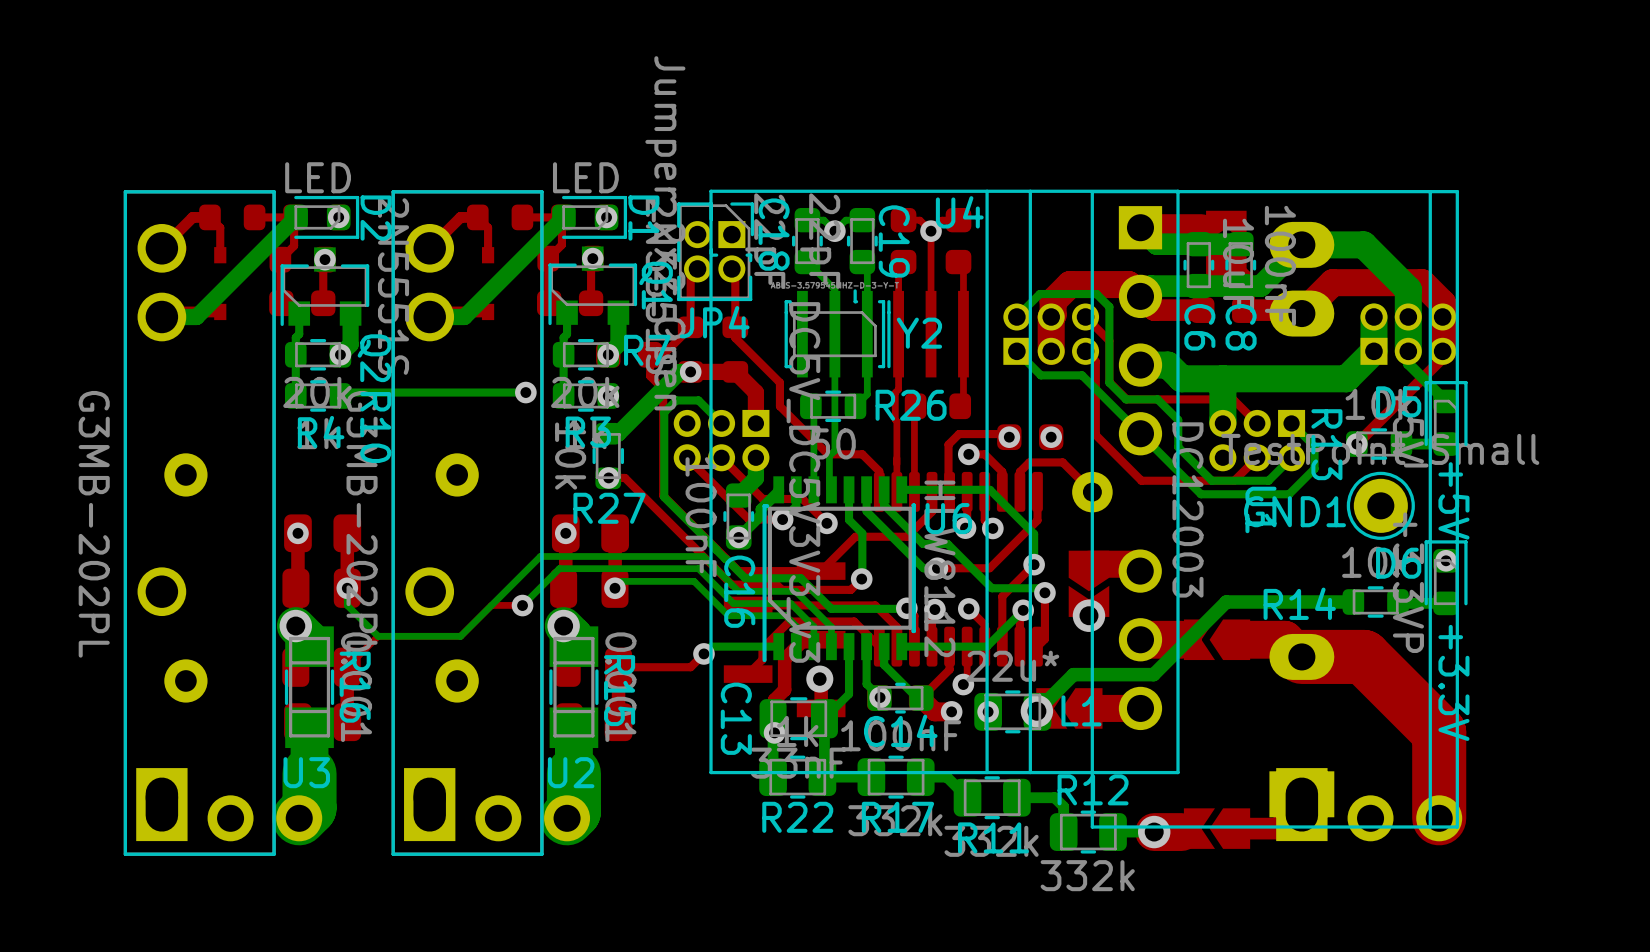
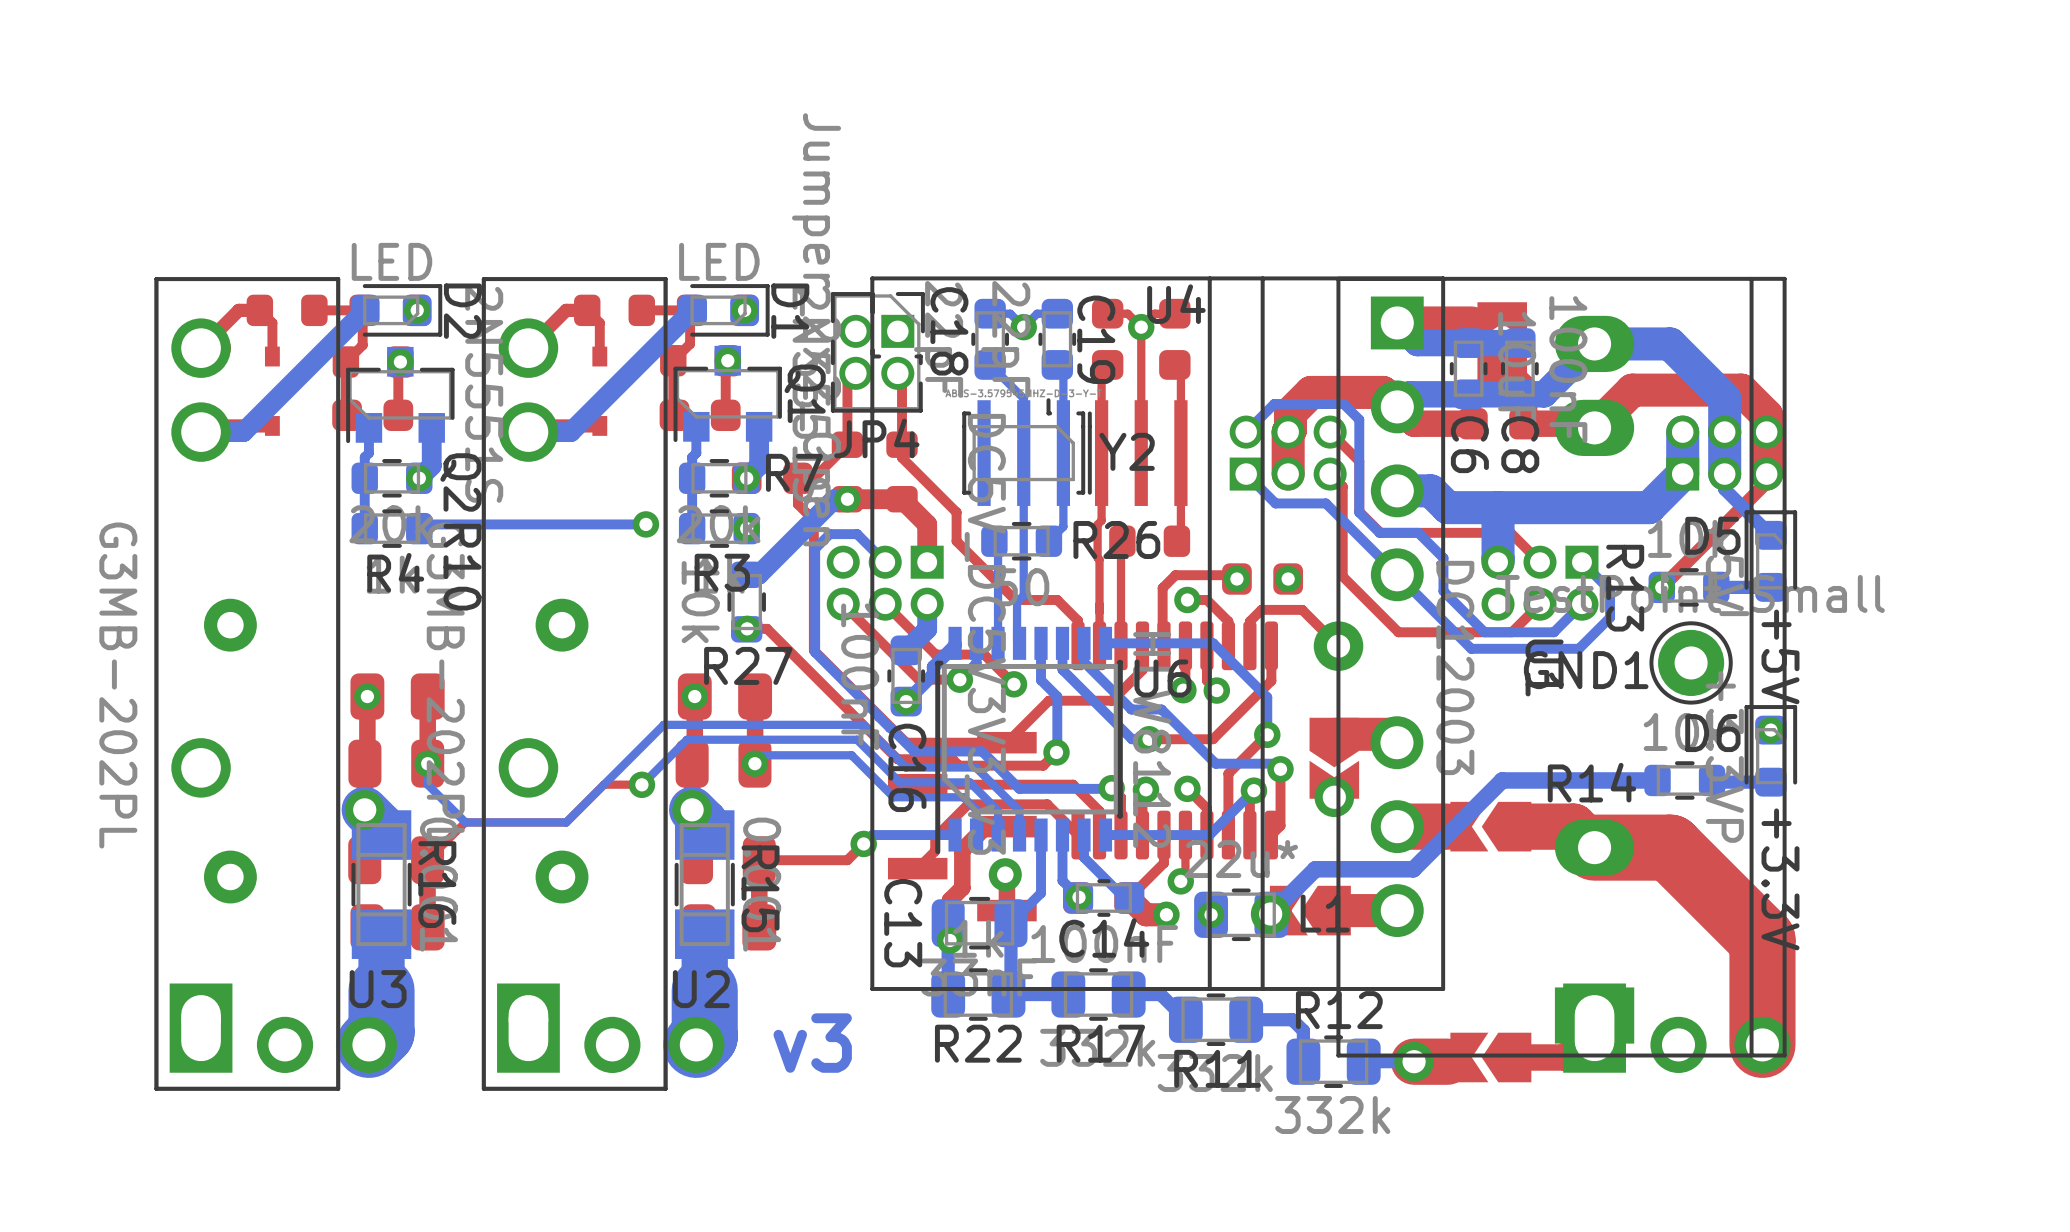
text: none -> v3 (812, 1043)

